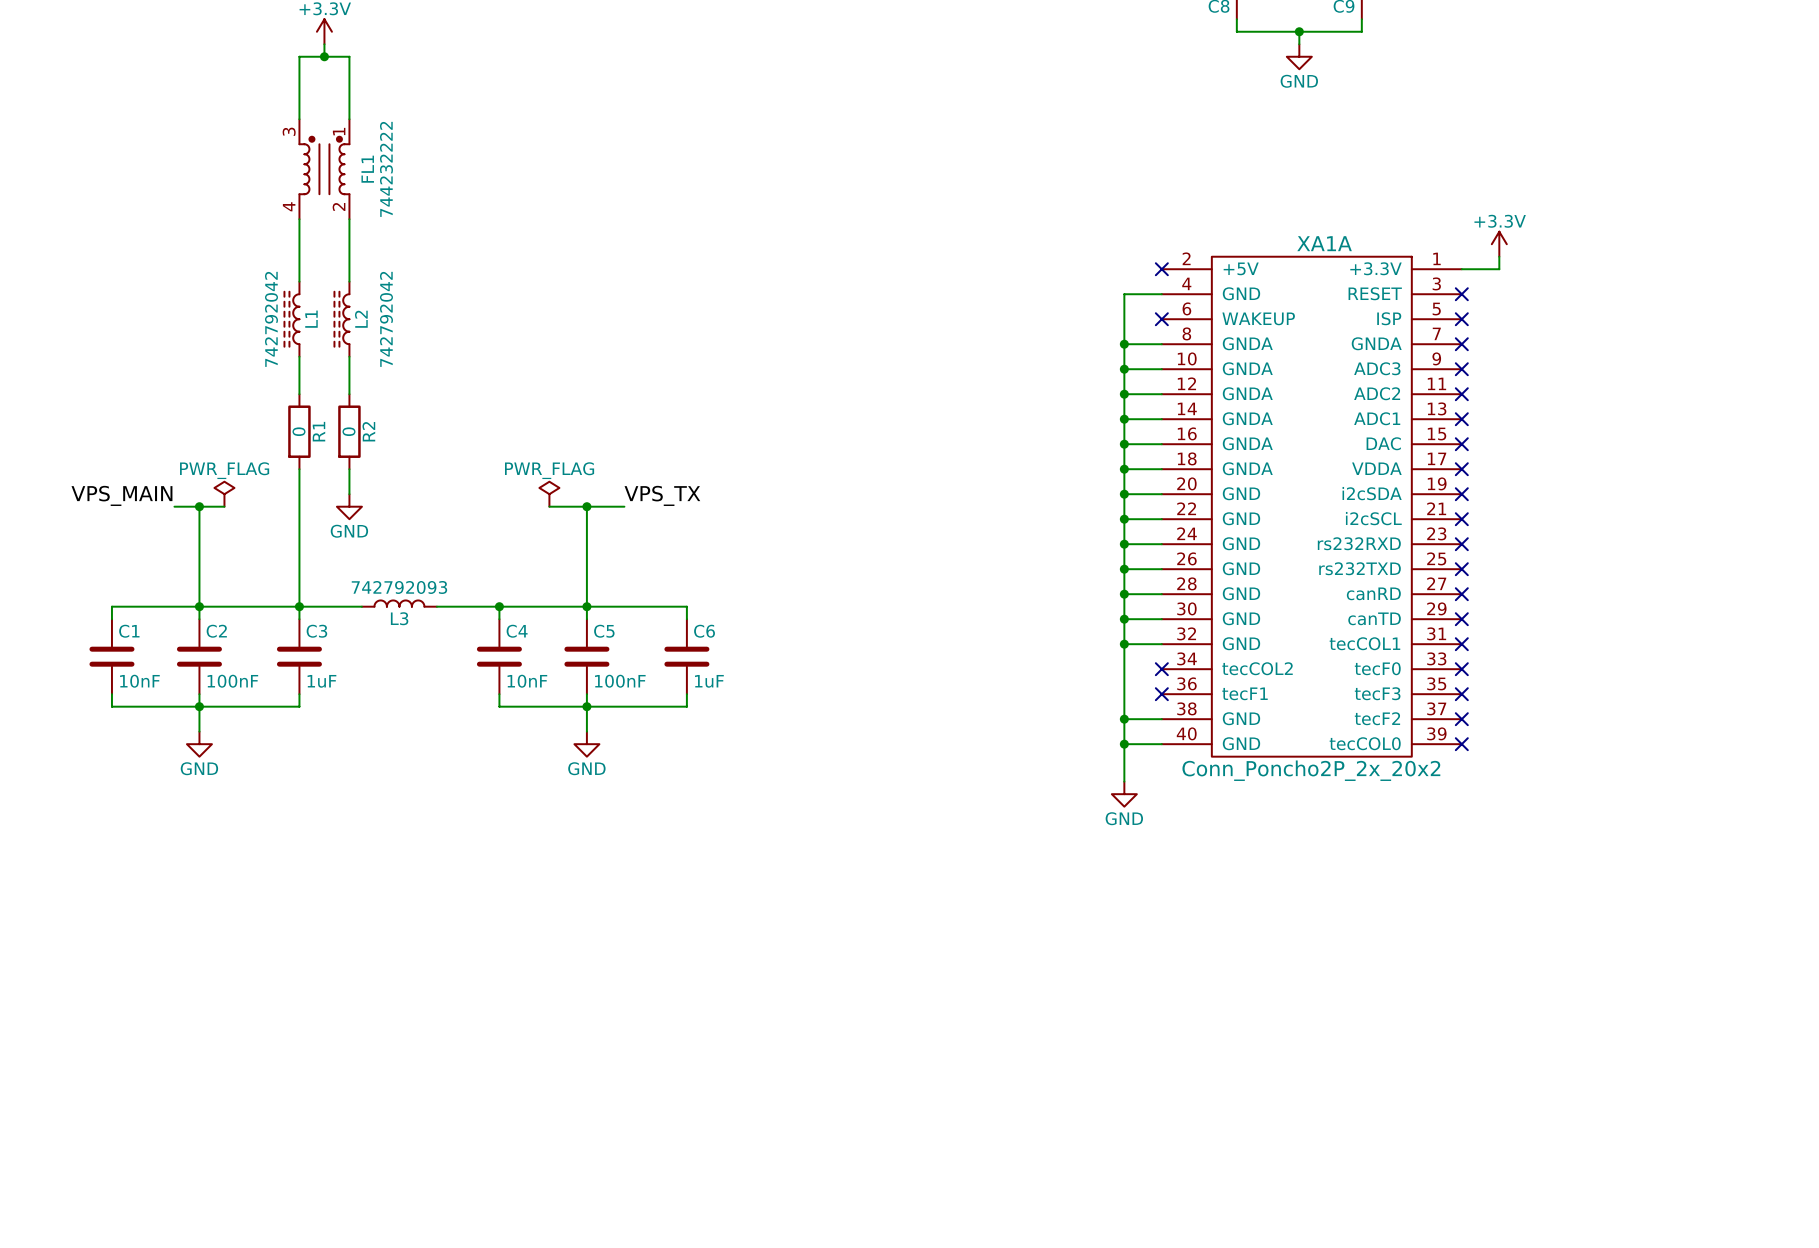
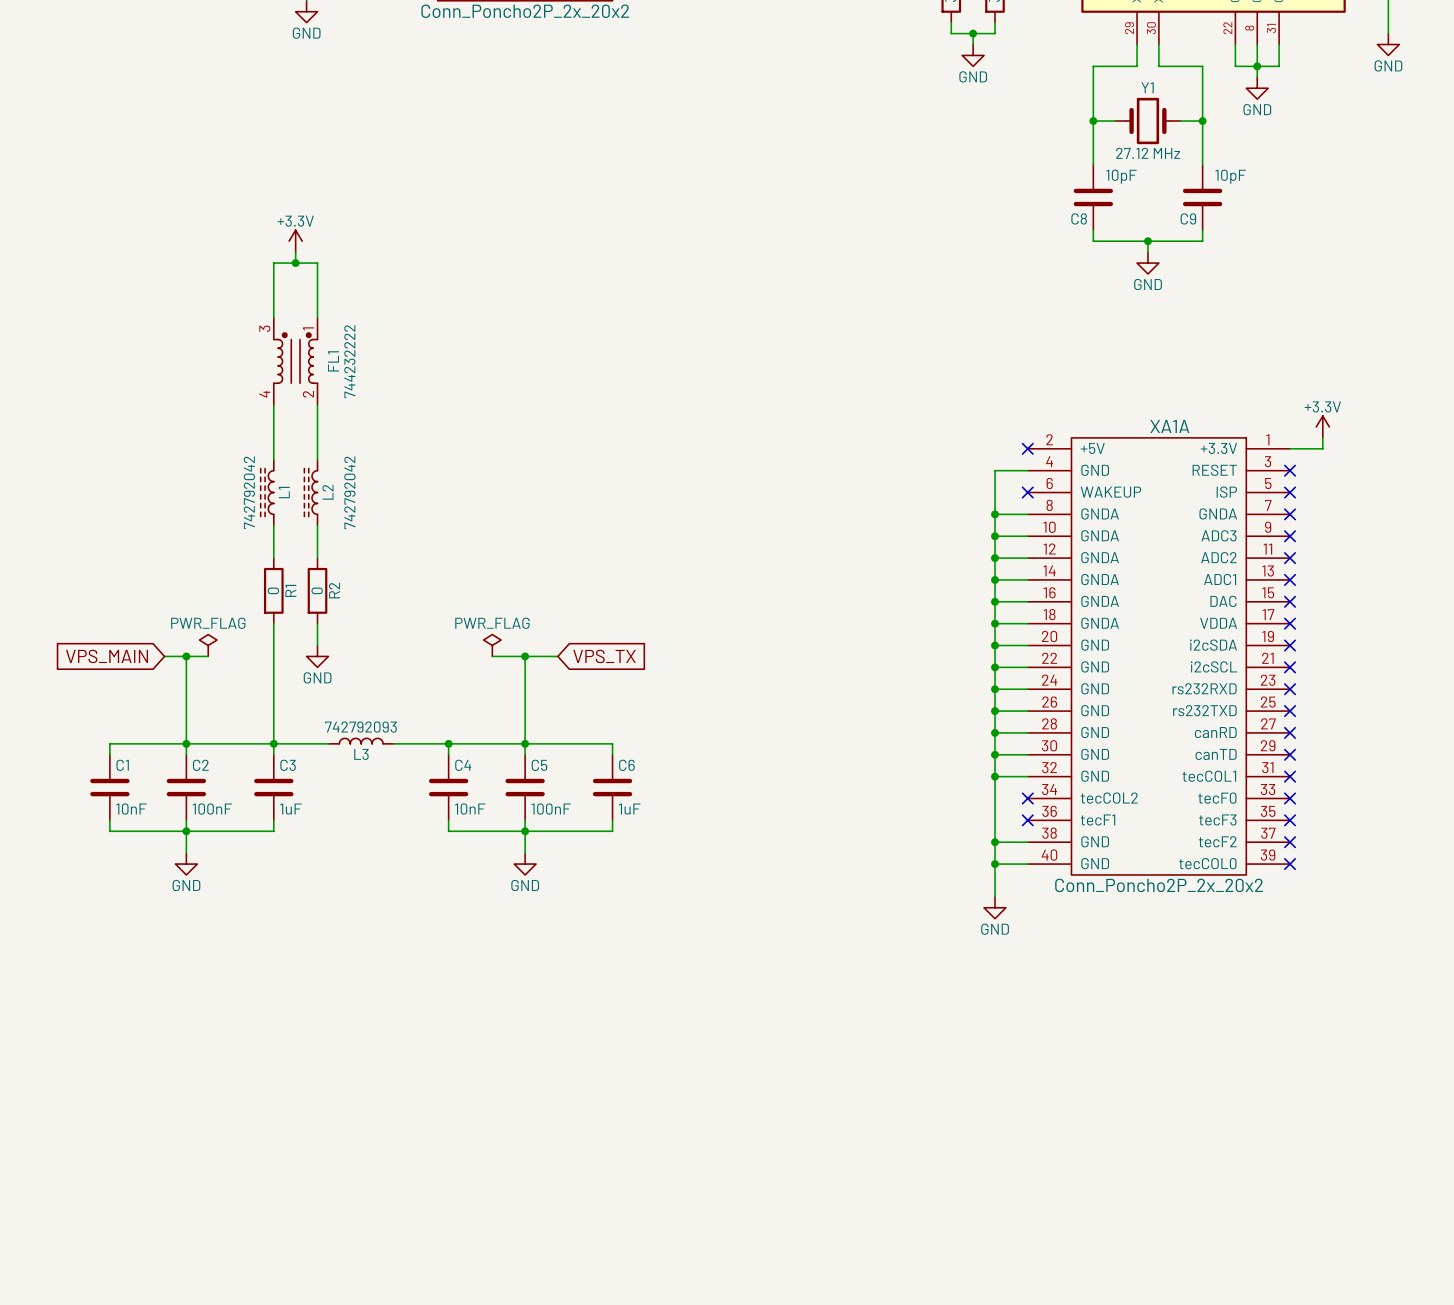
label: VPS_MAIN (121, 495) -> none
label: VPS_TX (662, 495) -> none
global label: none -> VPS_MAIN (107, 656)
global label: none -> VPS_TX (604, 656)

